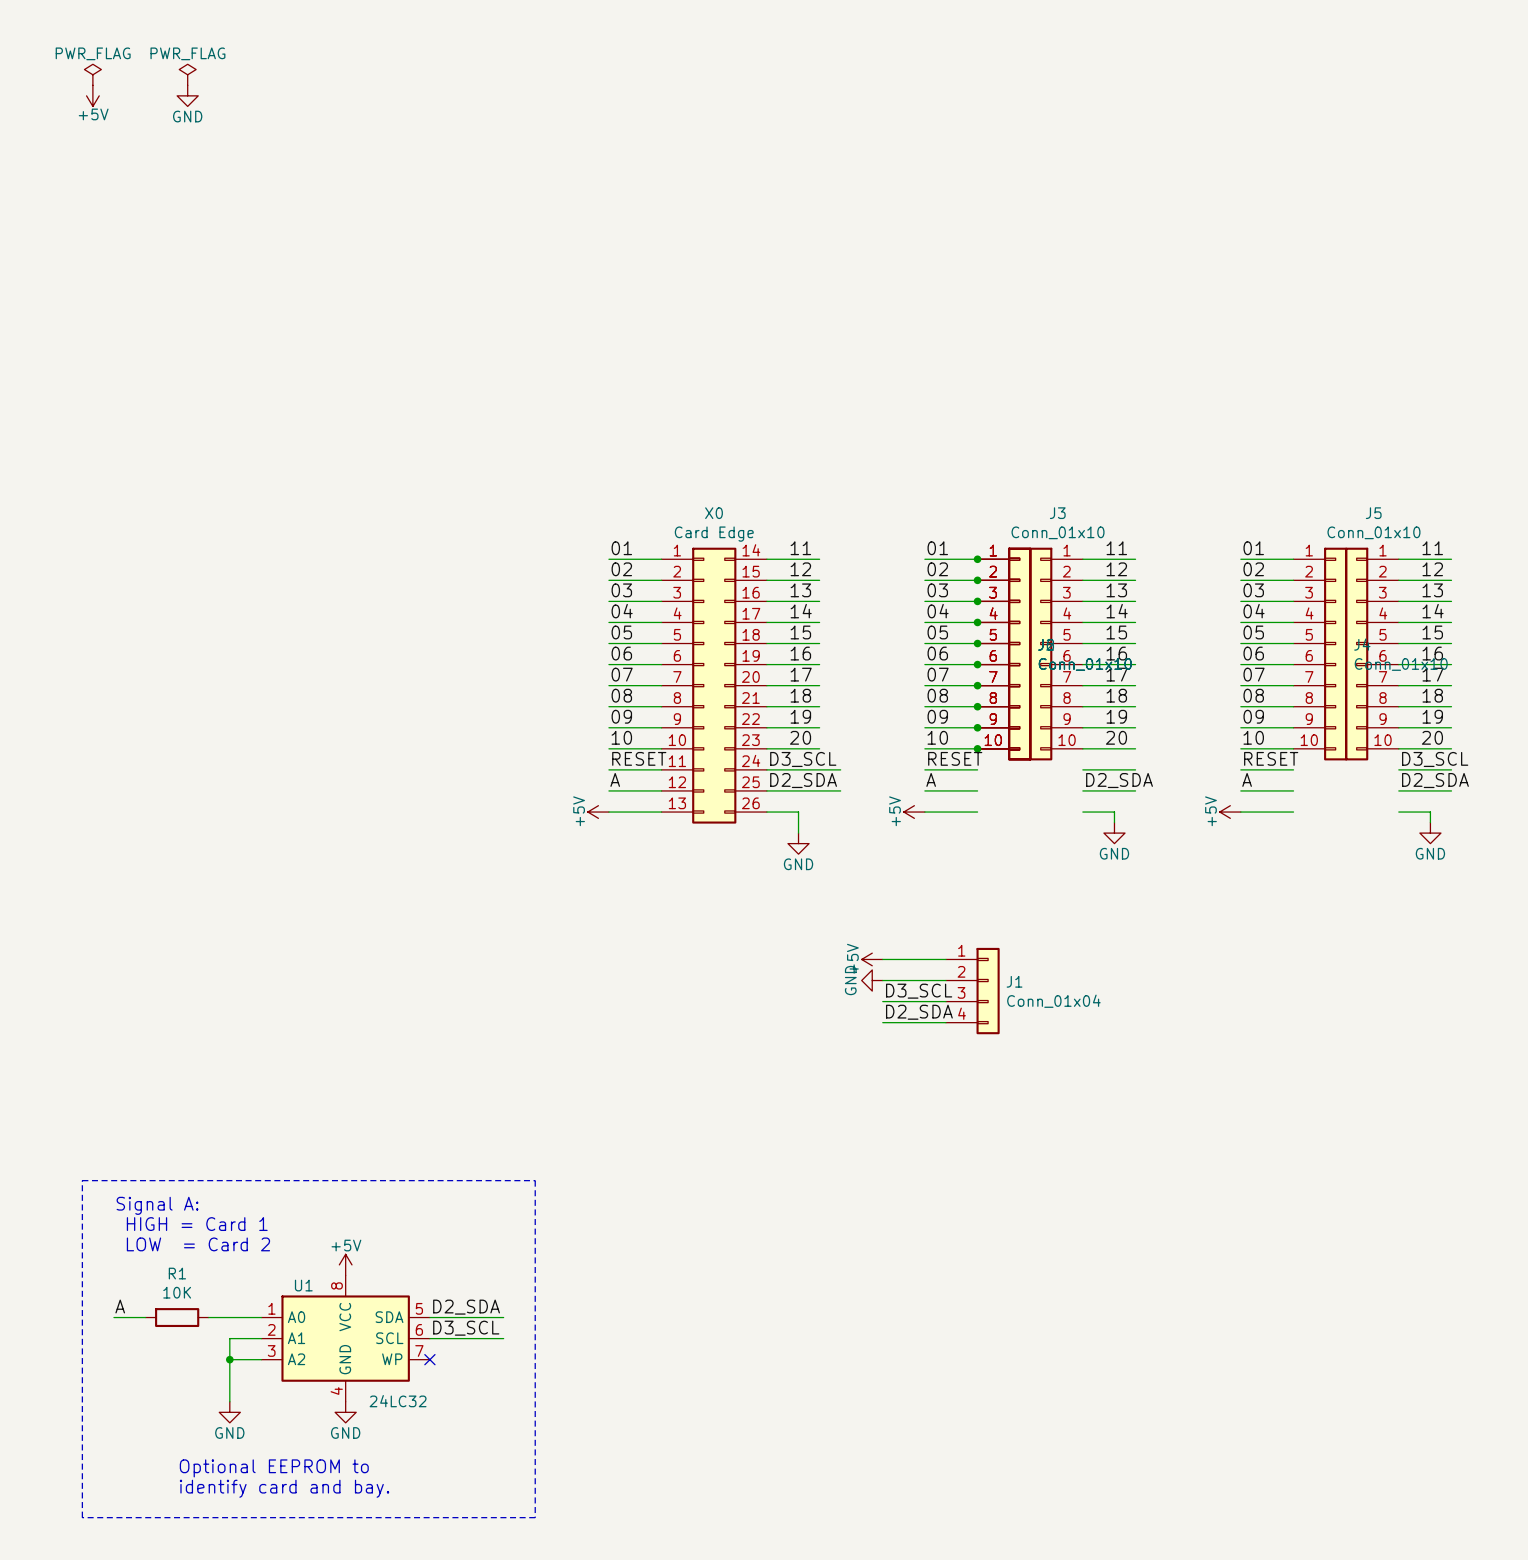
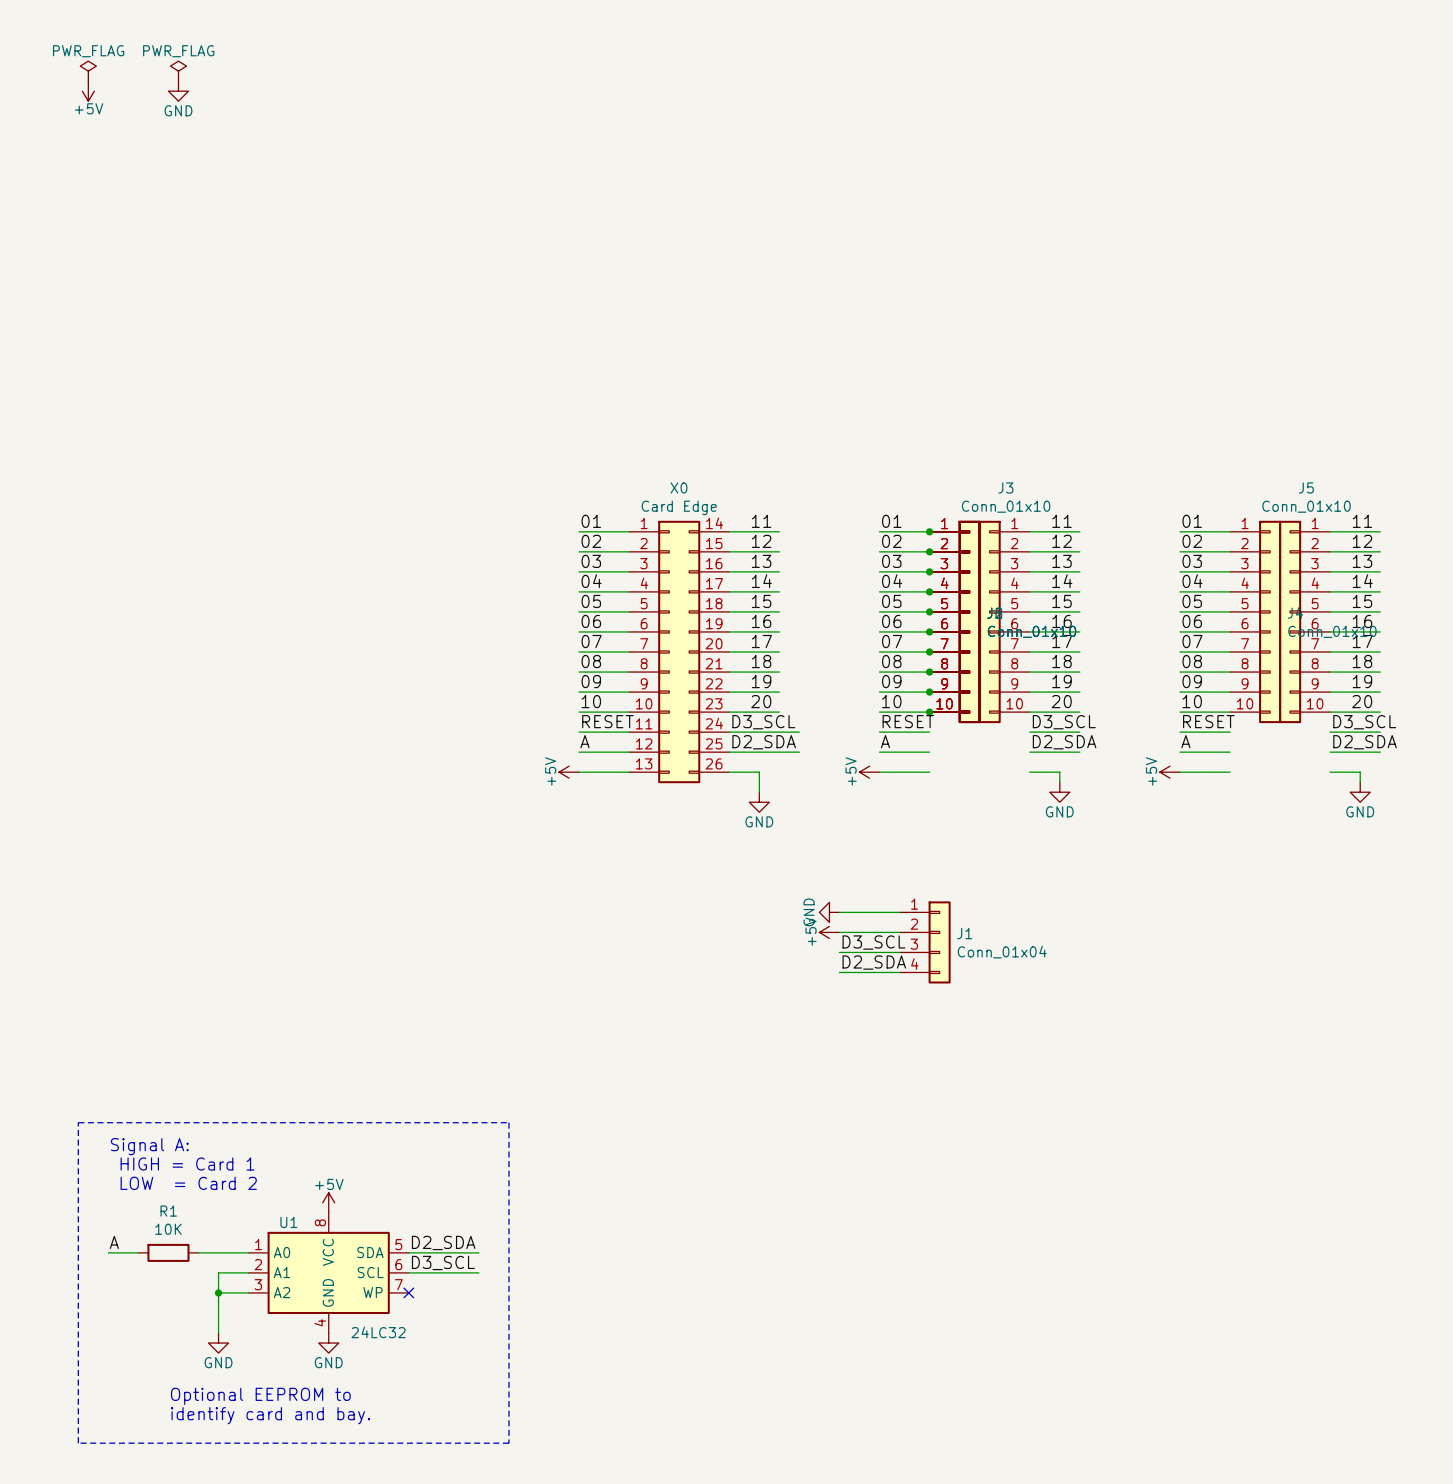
label: none -> D3_SCL (1064, 722)
power symbol: +5V (872, 959) -> GND (829, 912)
power symbol: GND (872, 980) -> +5V (829, 932)

